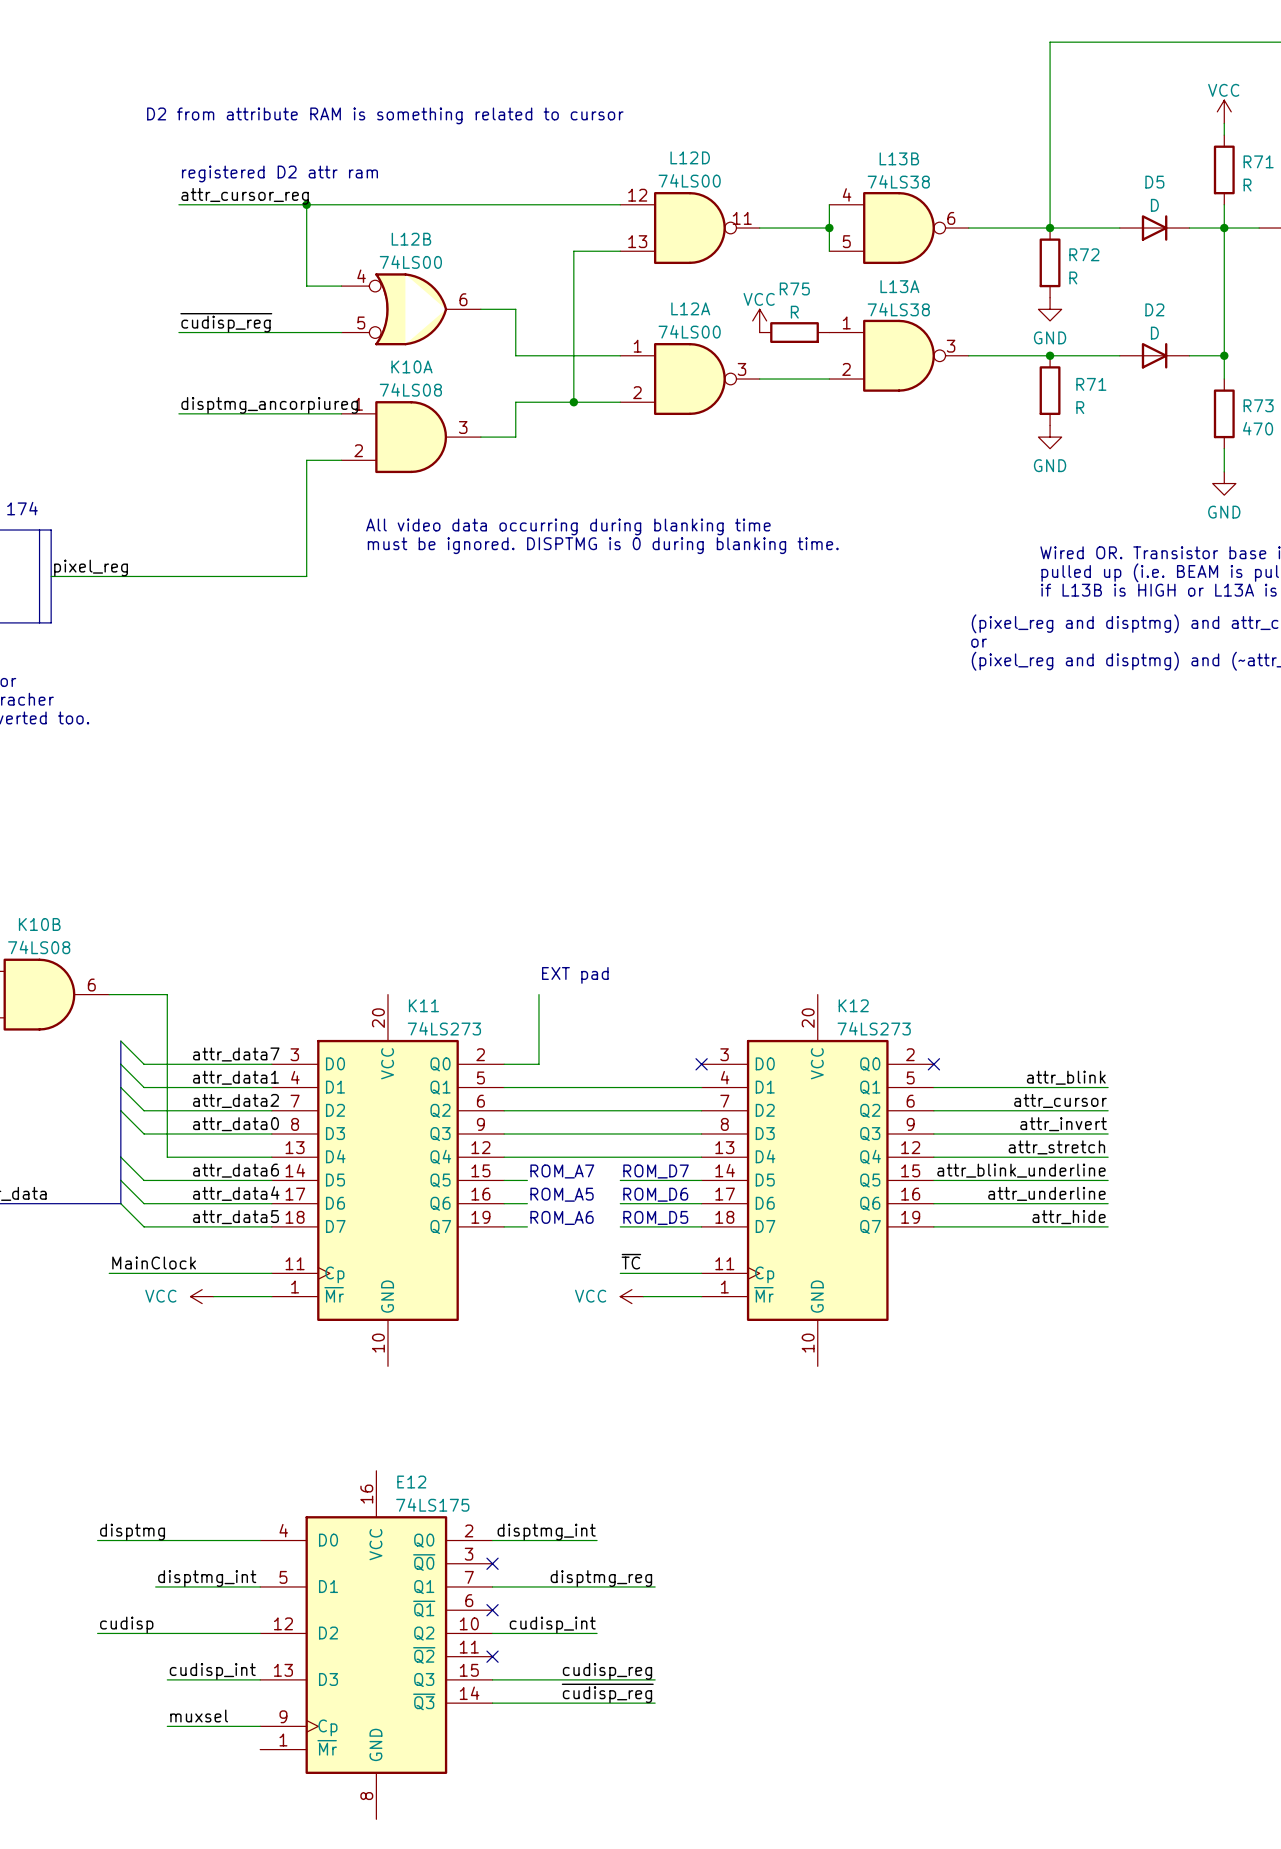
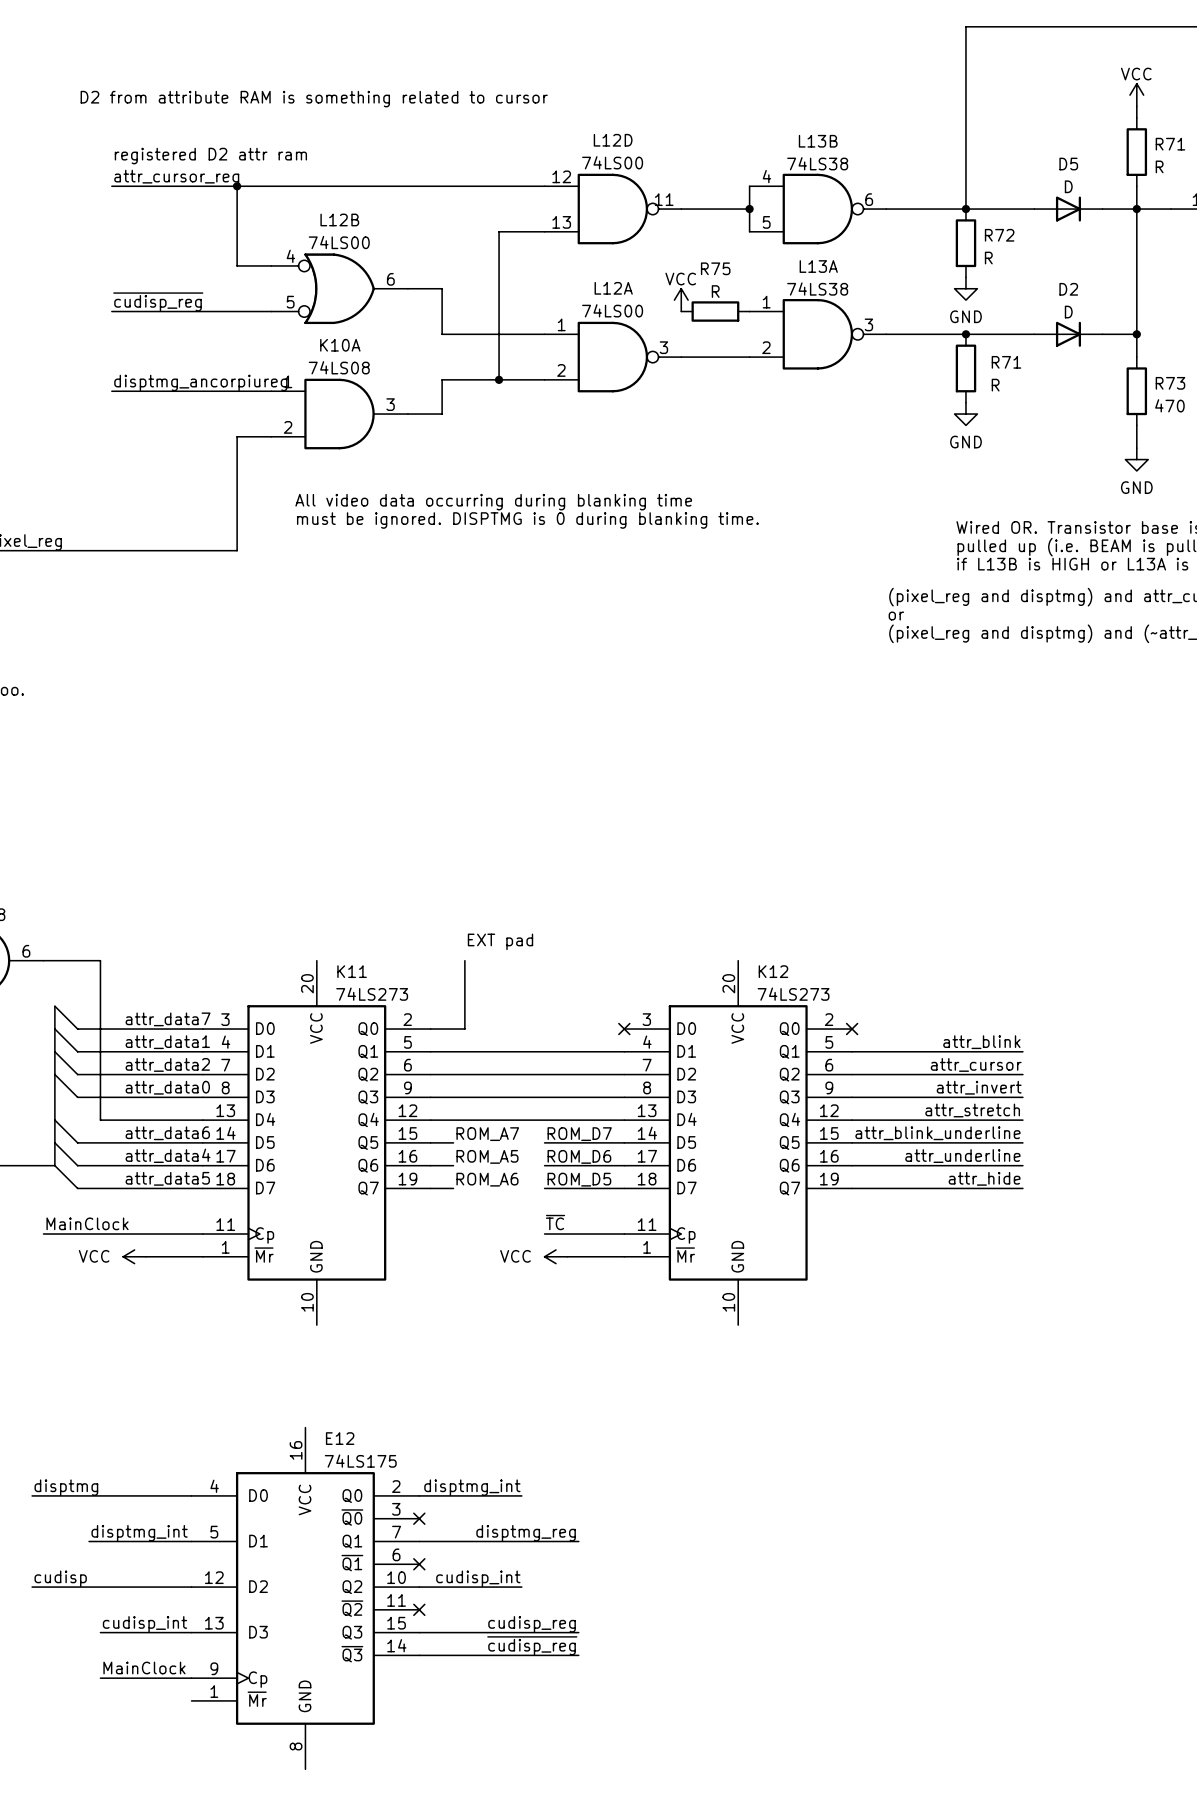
label: muxsel (199, 1716) -> MainClock (144, 1668)

